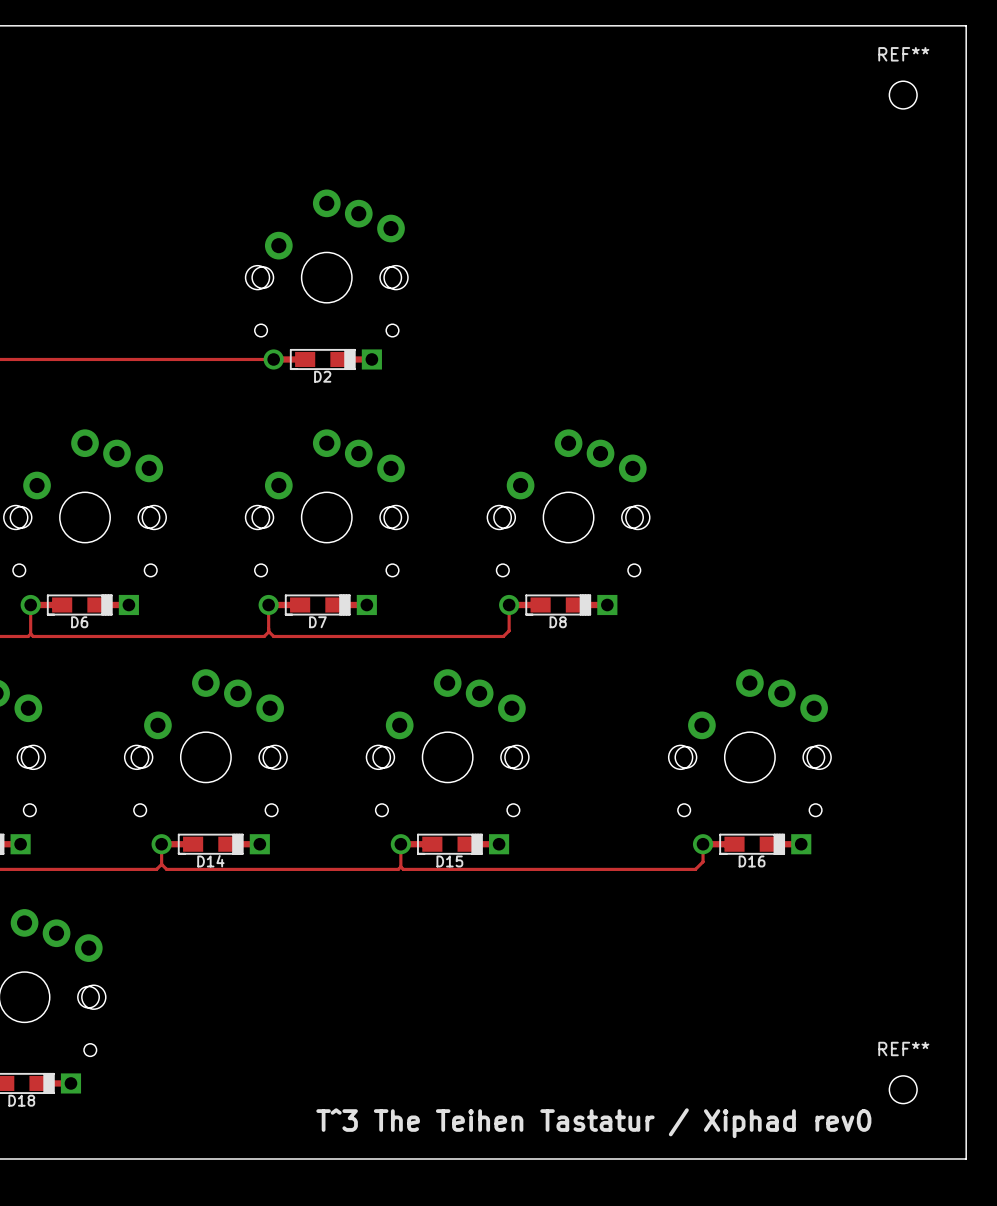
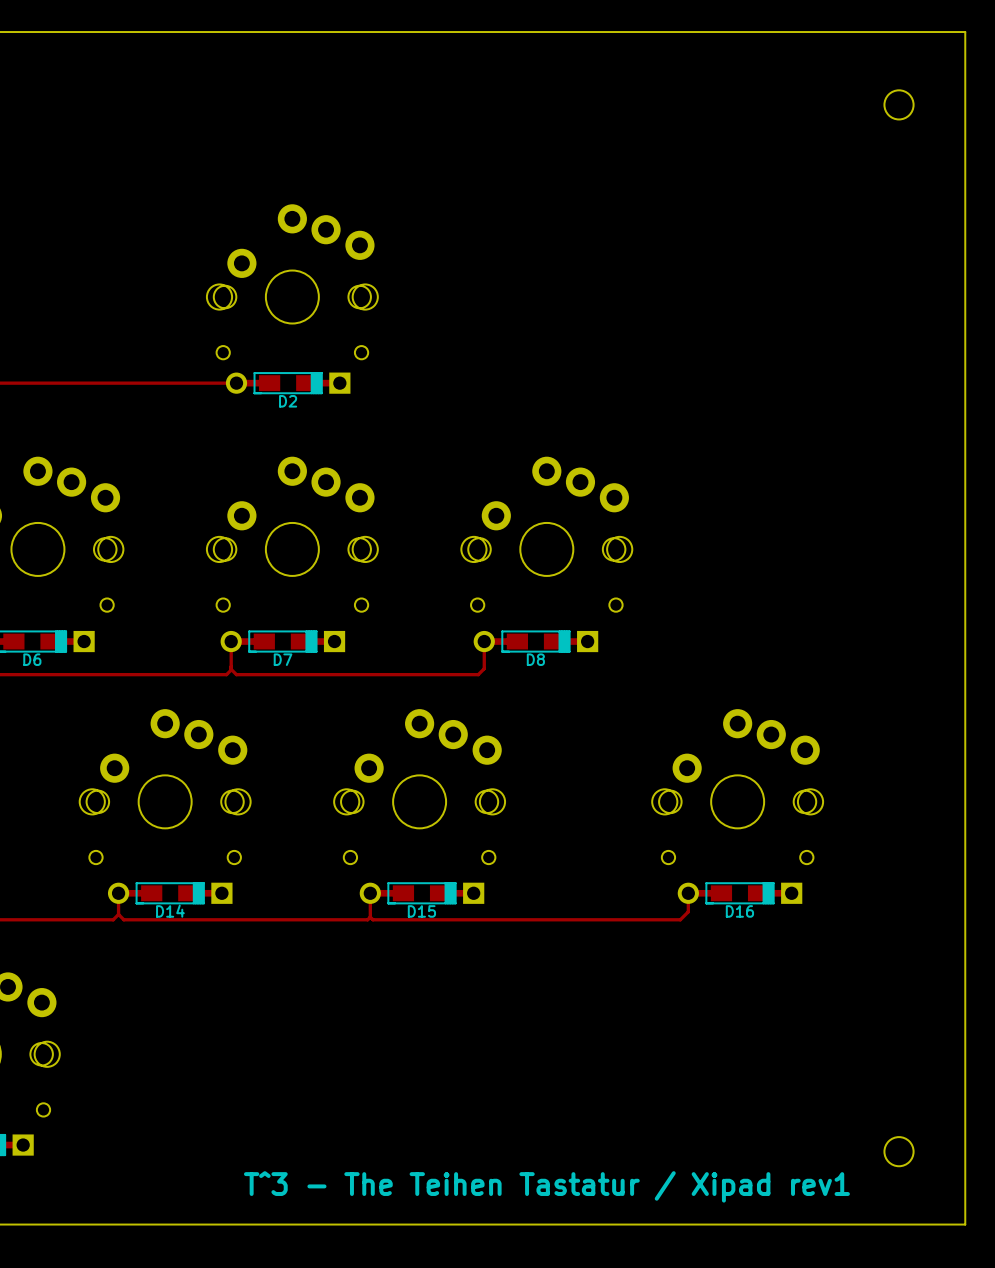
REF** name: REF** (903, 54) -> none
REF** name: REF** (903, 1048) -> none
text: T^3 The Teihen Tastatur / Xiphad rev0 (593, 1123) -> T^3 - The Teihen Tastatur / Xipad rev1 (546, 1186)

